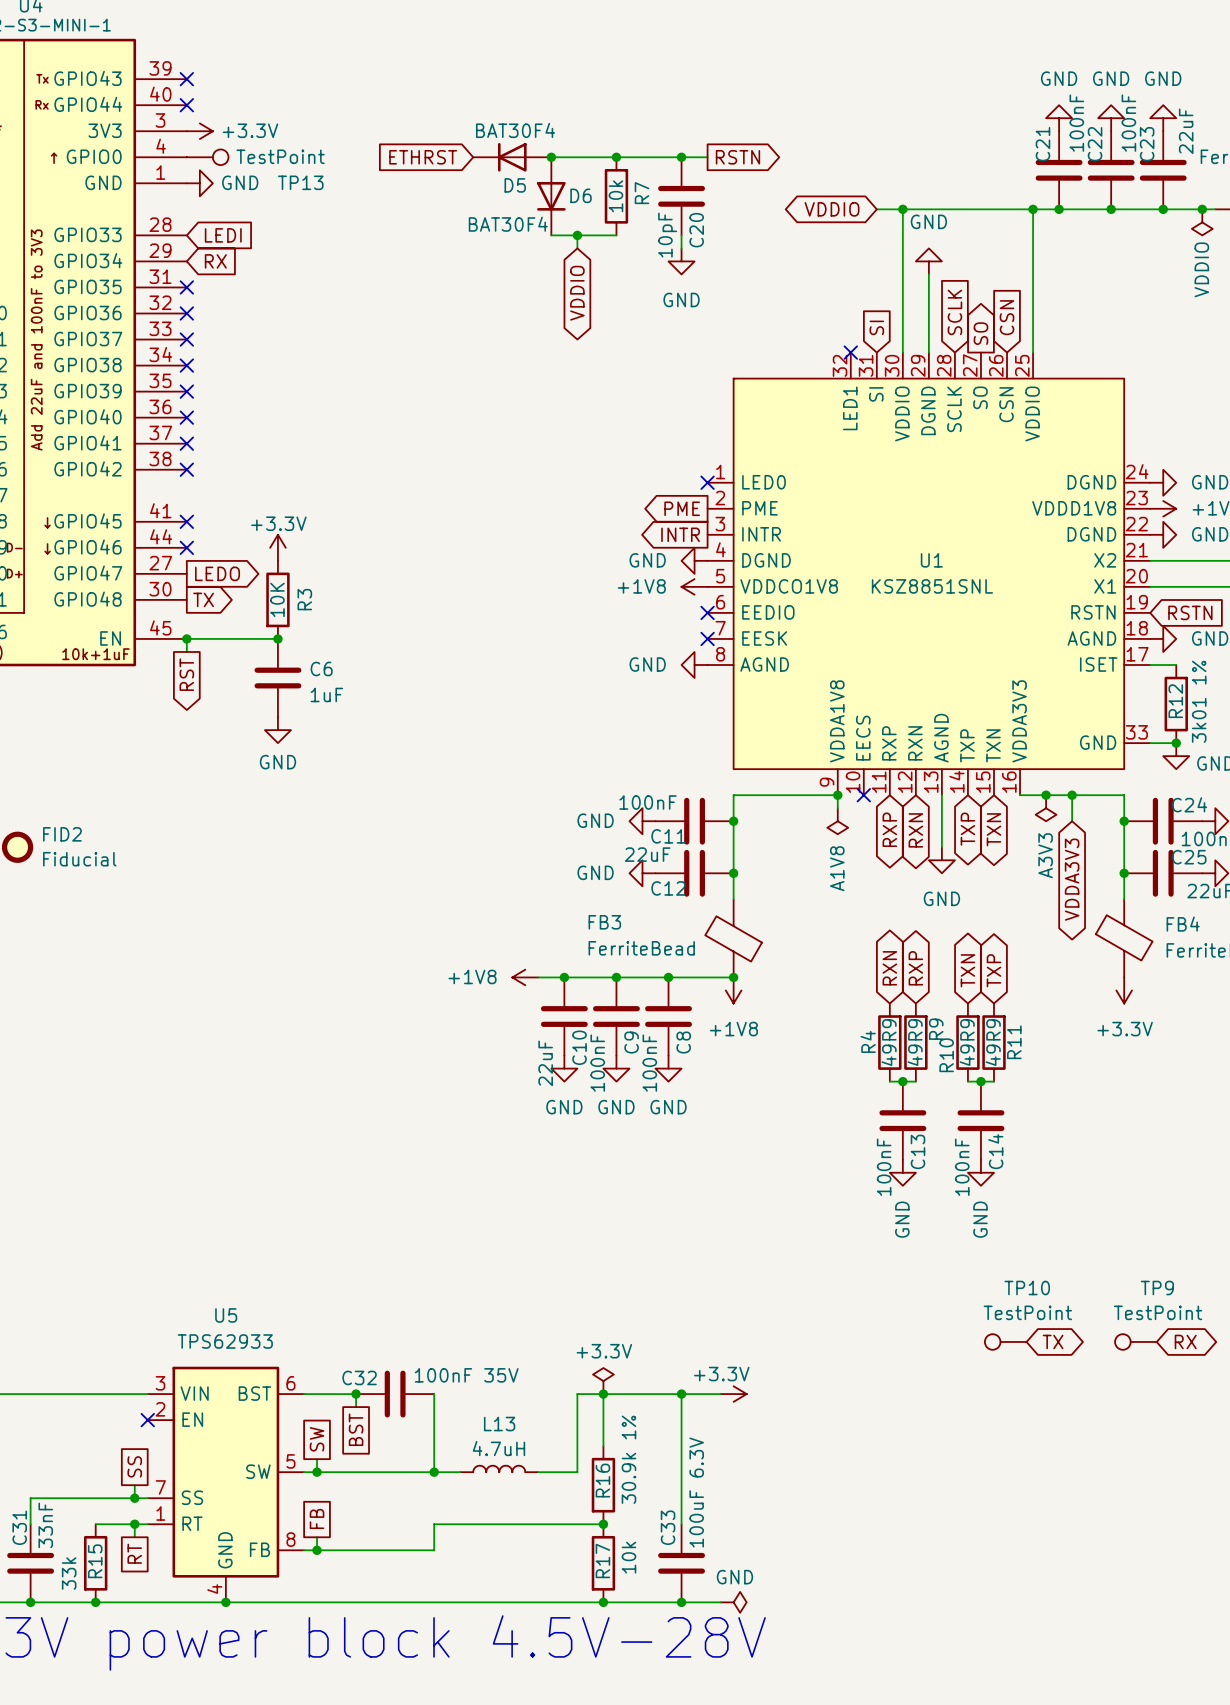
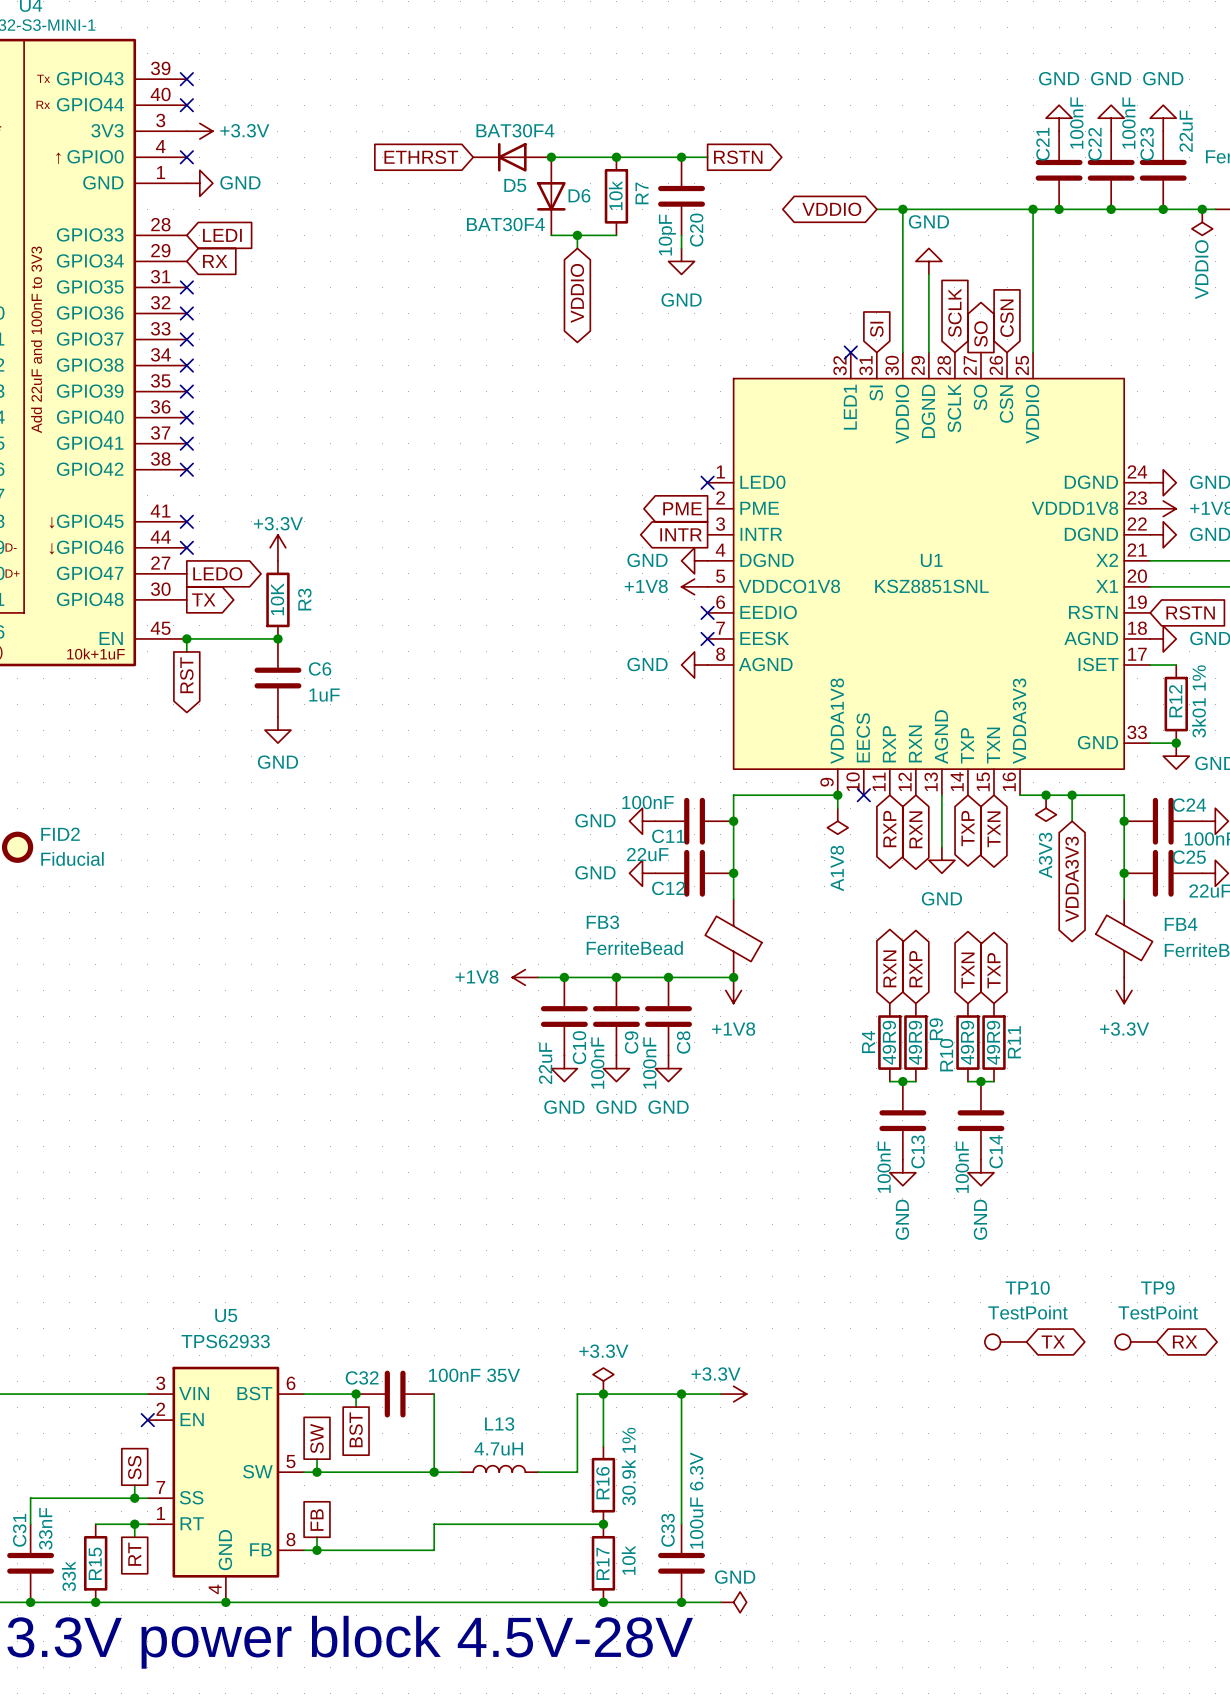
no-connect mark: none -> (186, 157)
TP13: TestPoint (207, 157) -> none

